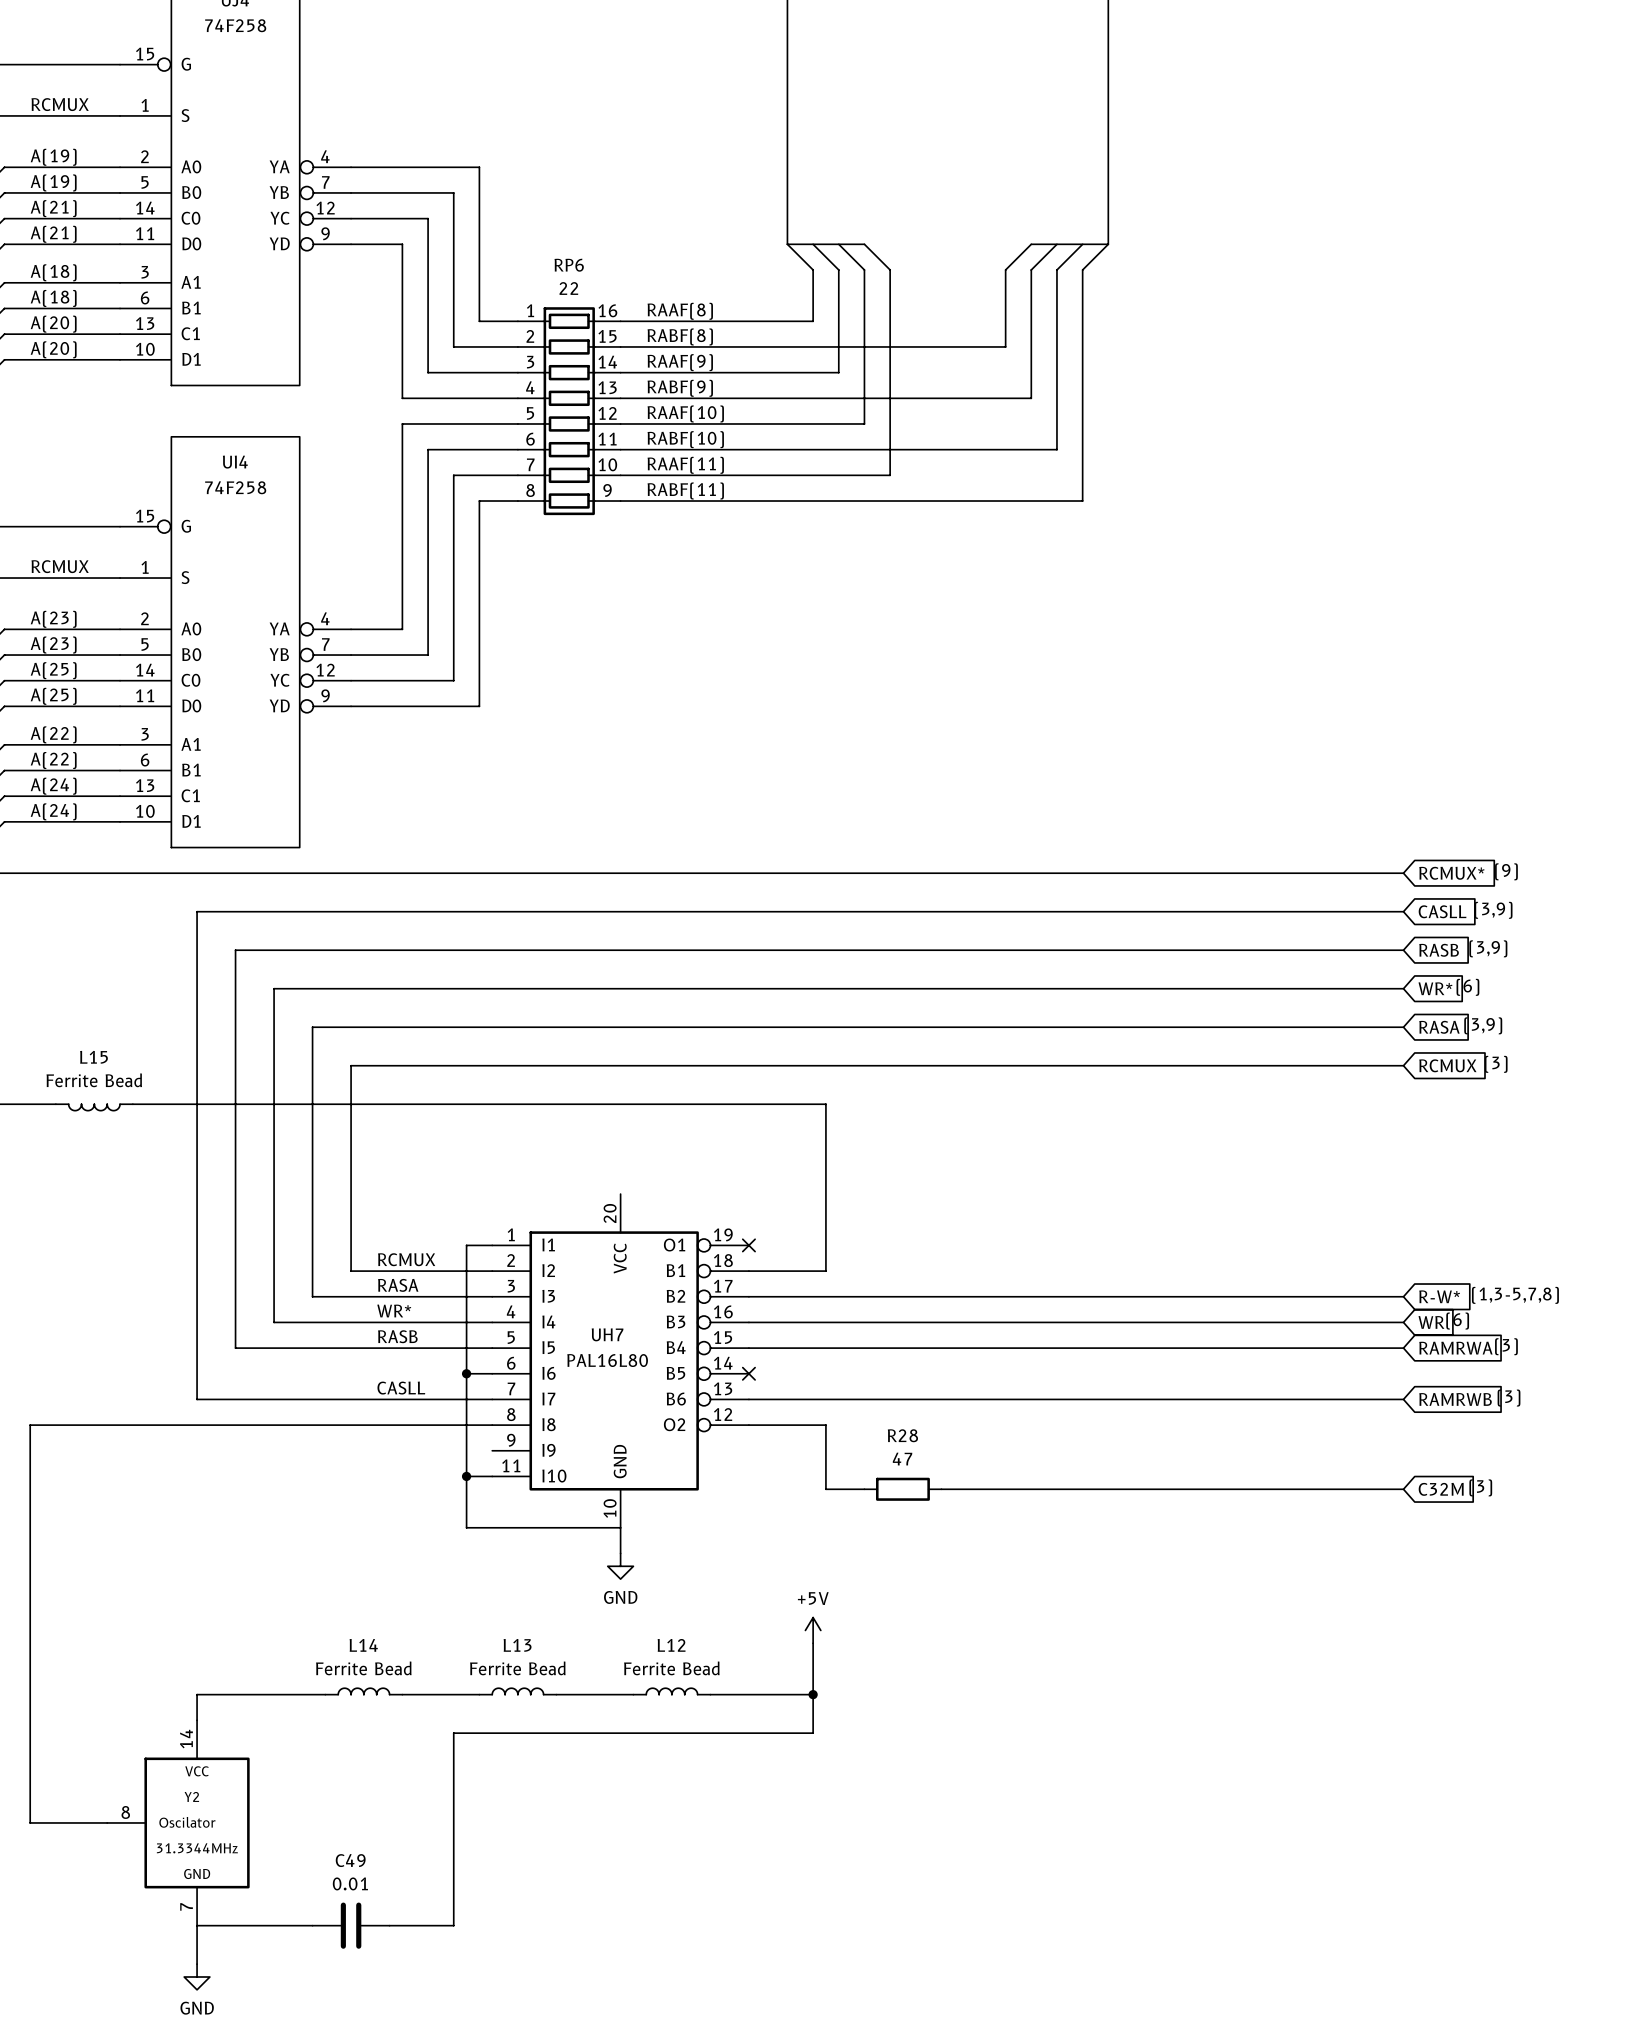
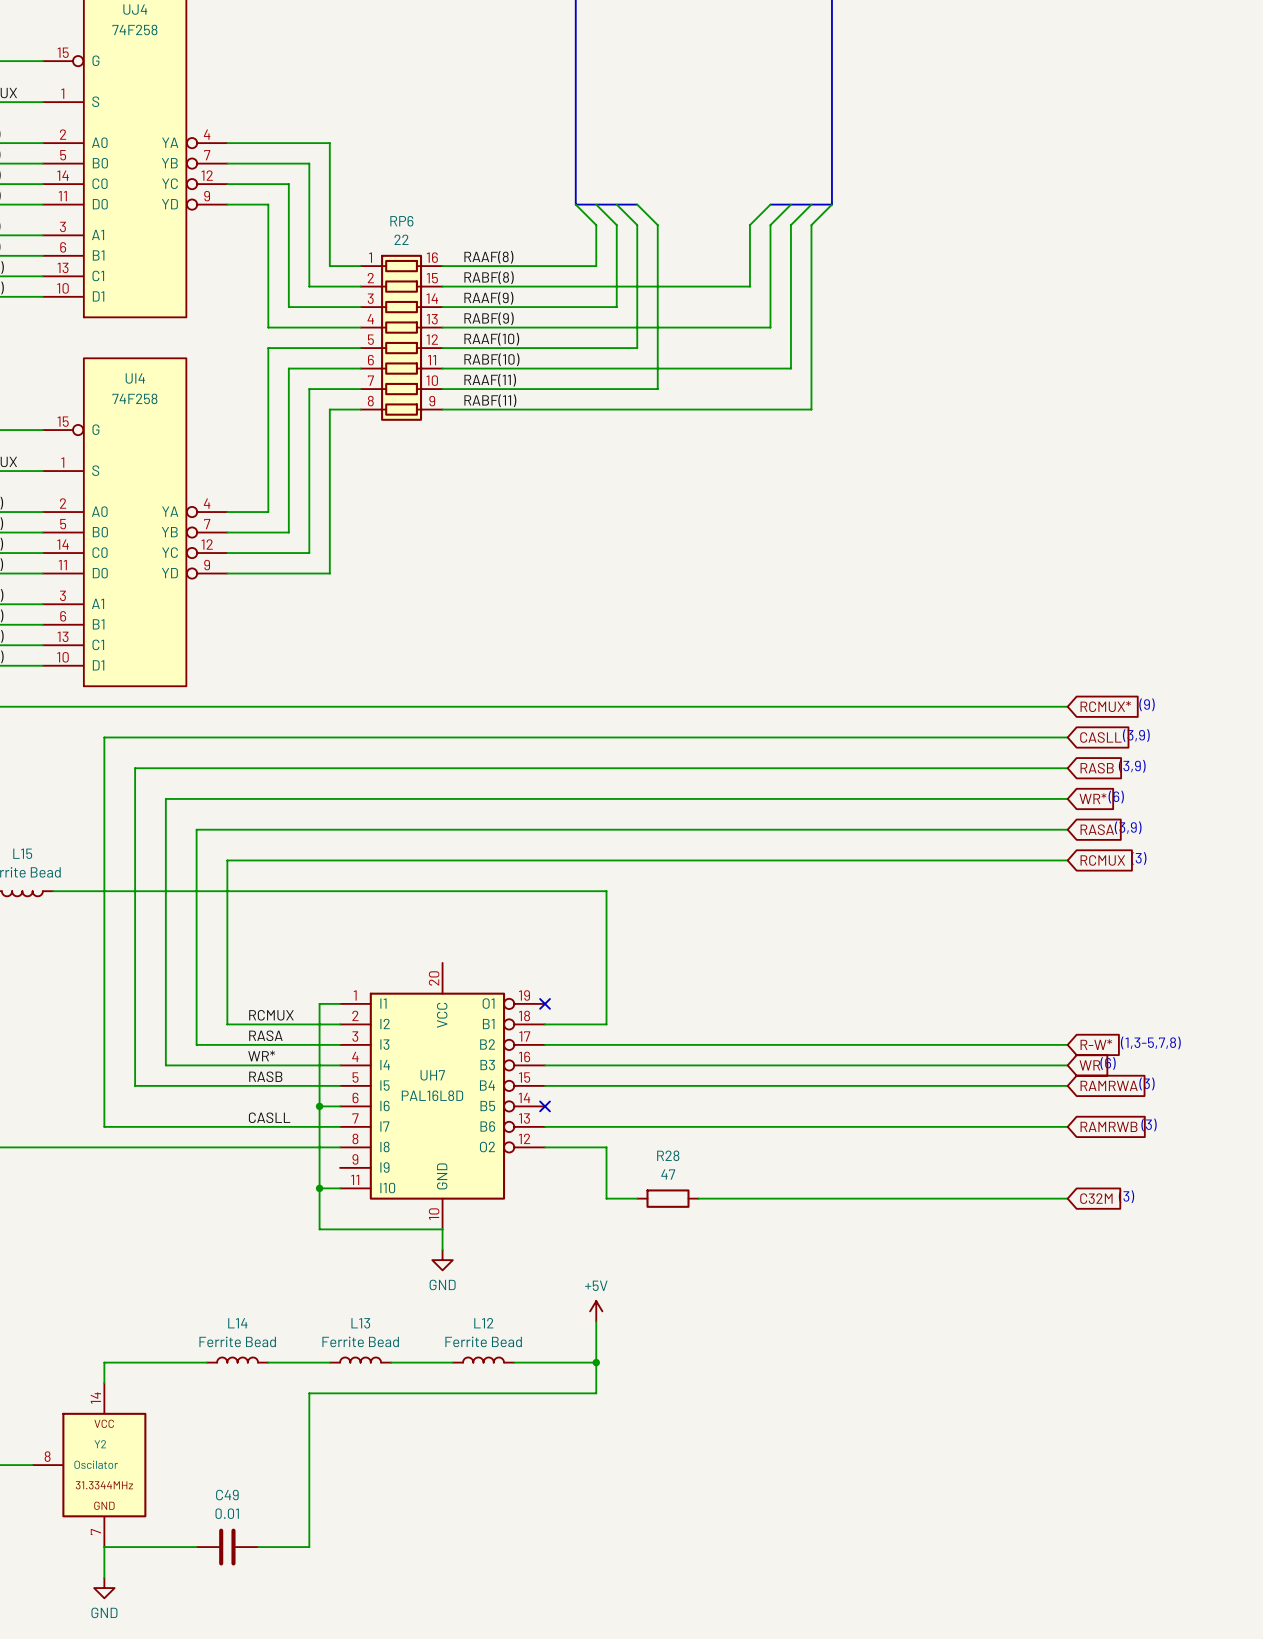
UH7 value: PAL16L80 (607, 1360) -> PAL16L8D (432, 1095)

